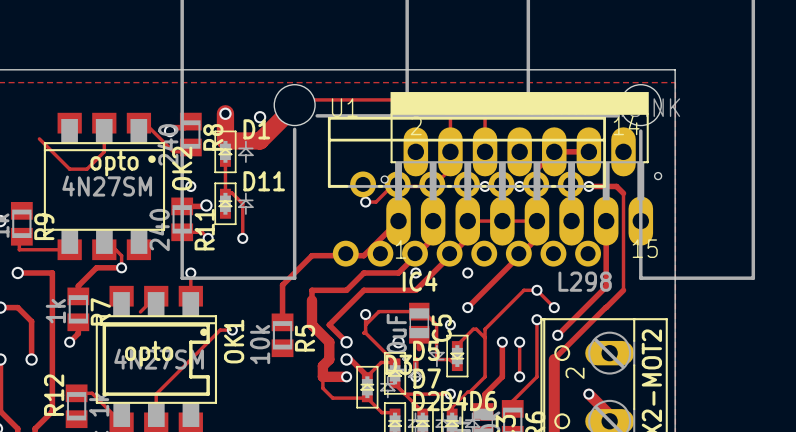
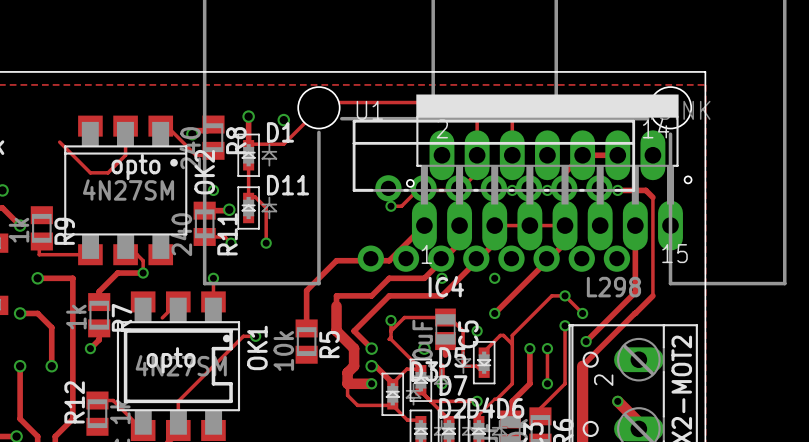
track width: thick (301, 99) (260, 140) (225, 140) (225, 113) -> thin (325, 102) (283, 144) (248, 144) (248, 116)

